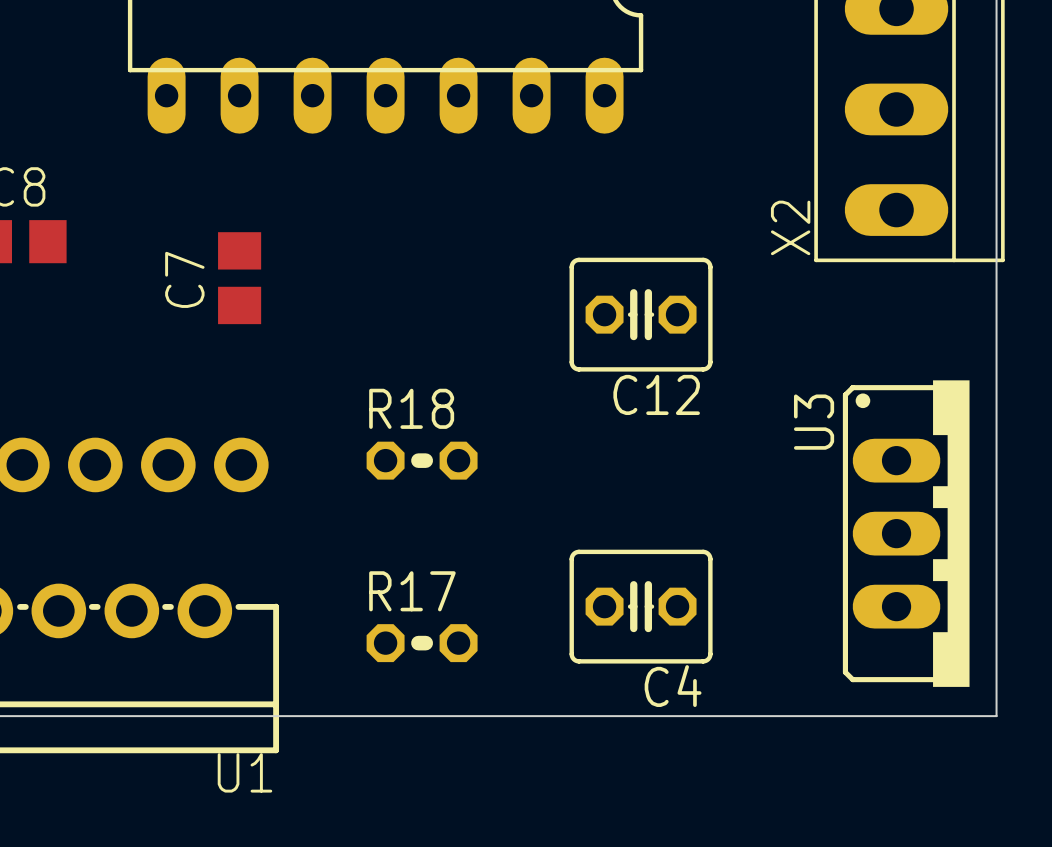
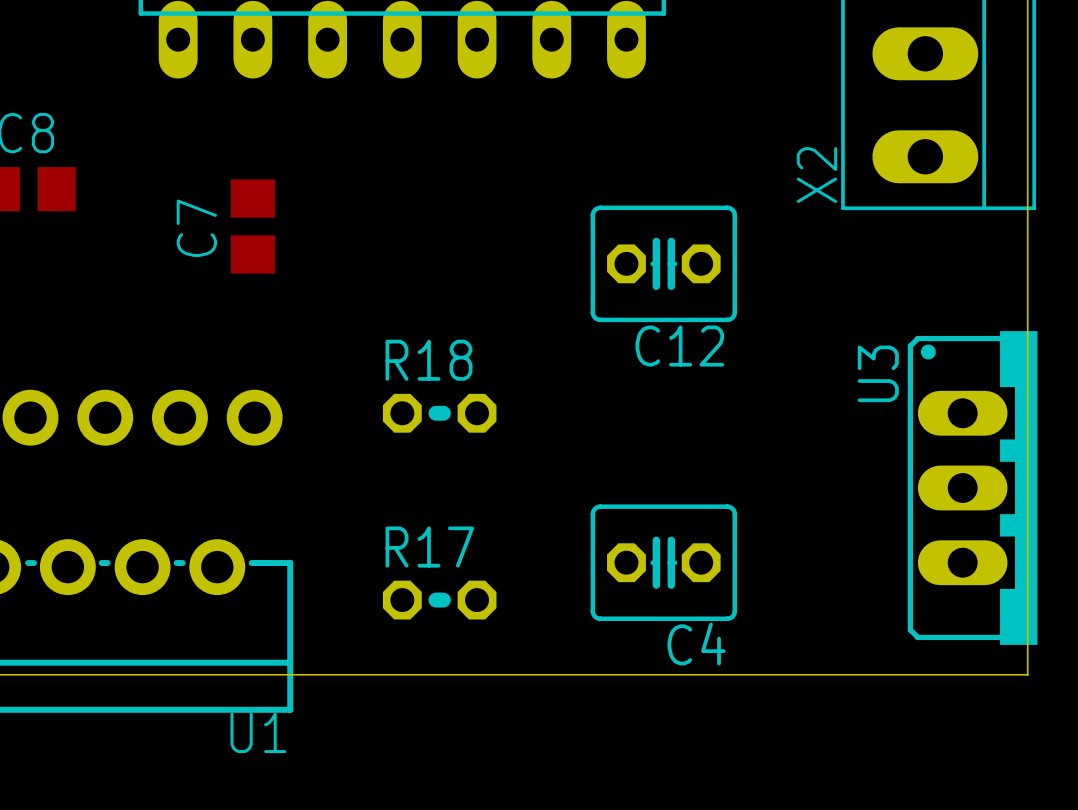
U3 position: (906, 533) -> (972, 487)

